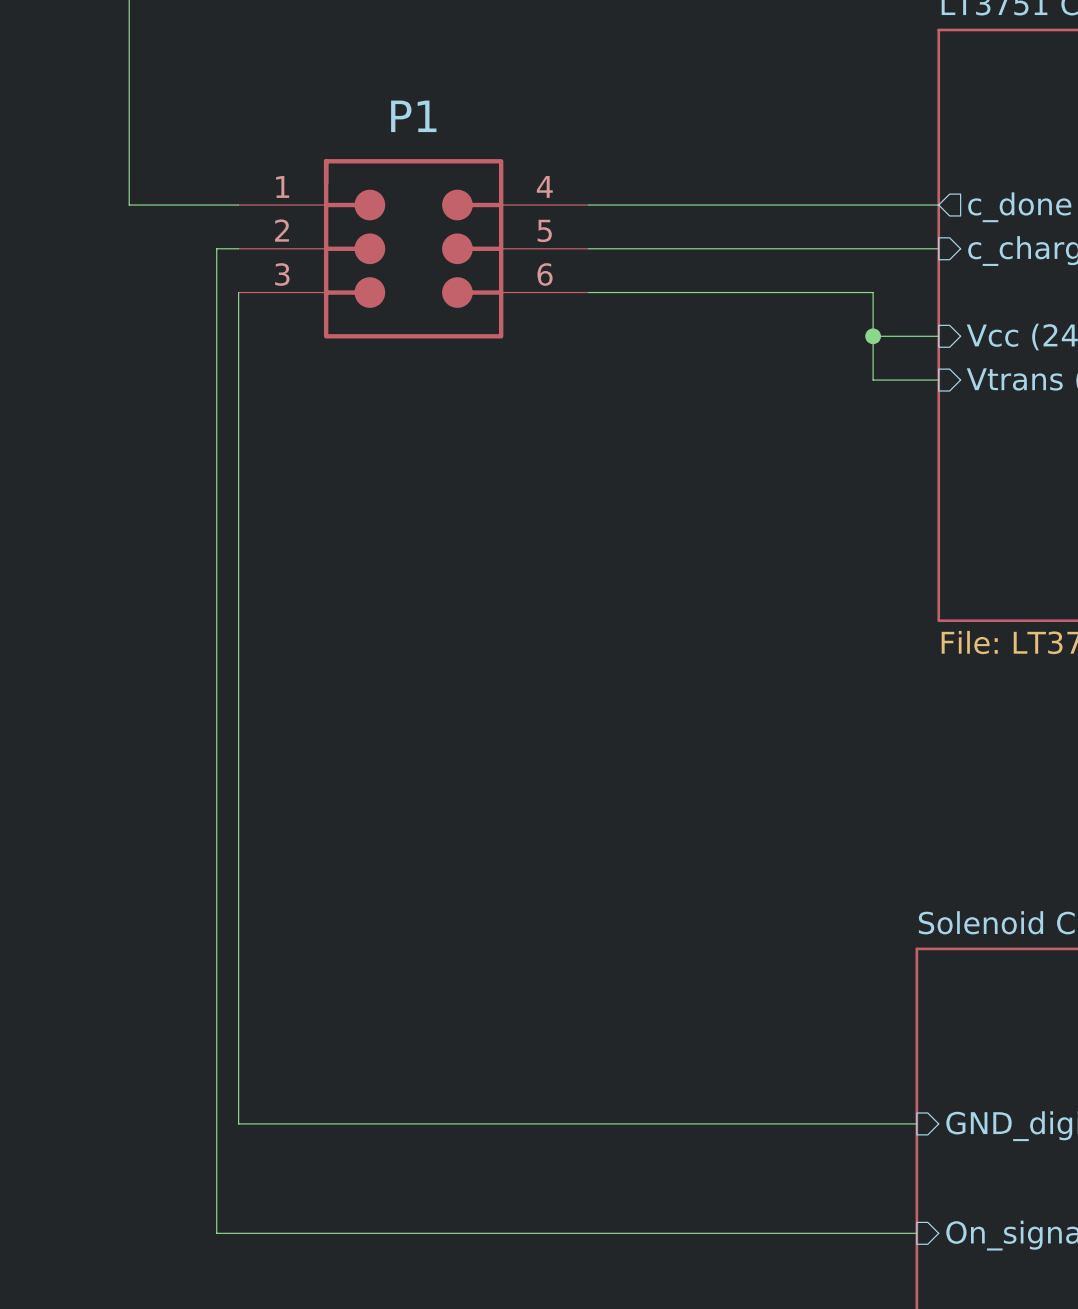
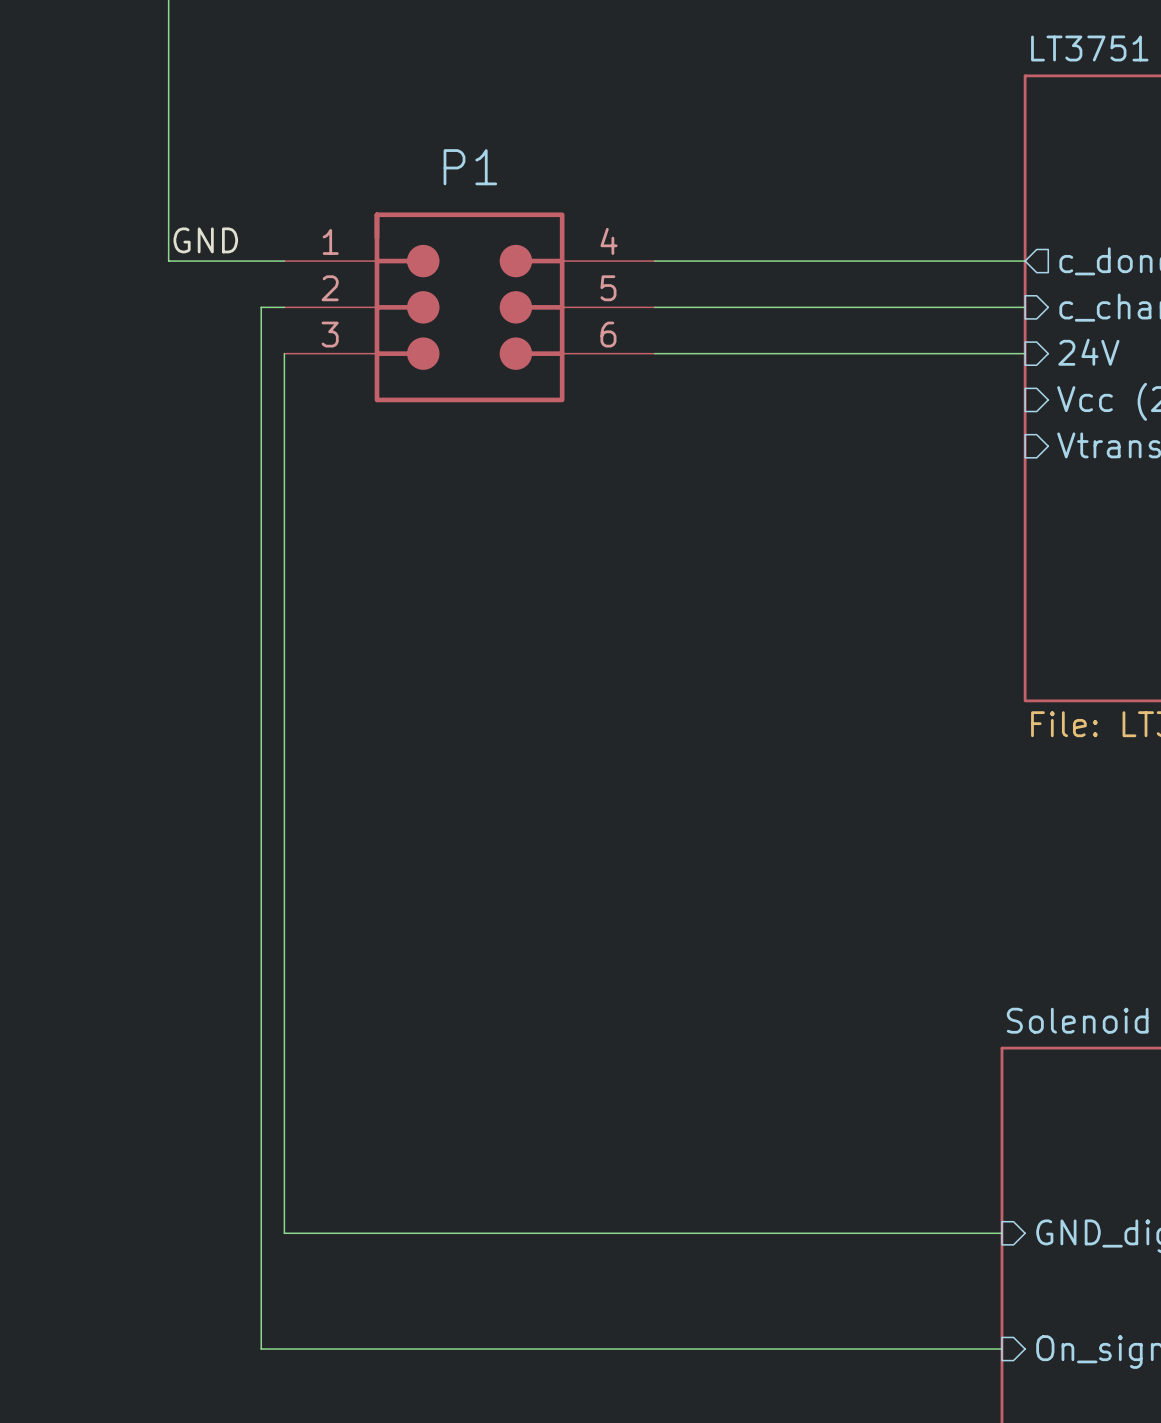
label: none -> GND (205, 240)
sheet pin: none -> 24V (1088, 352)
wire: (873, 292) (873, 380) (938, 380) -> (955, 353) (1025, 353)
wire: (873, 336) (938, 336) -> none
junction: (873, 336) -> none

